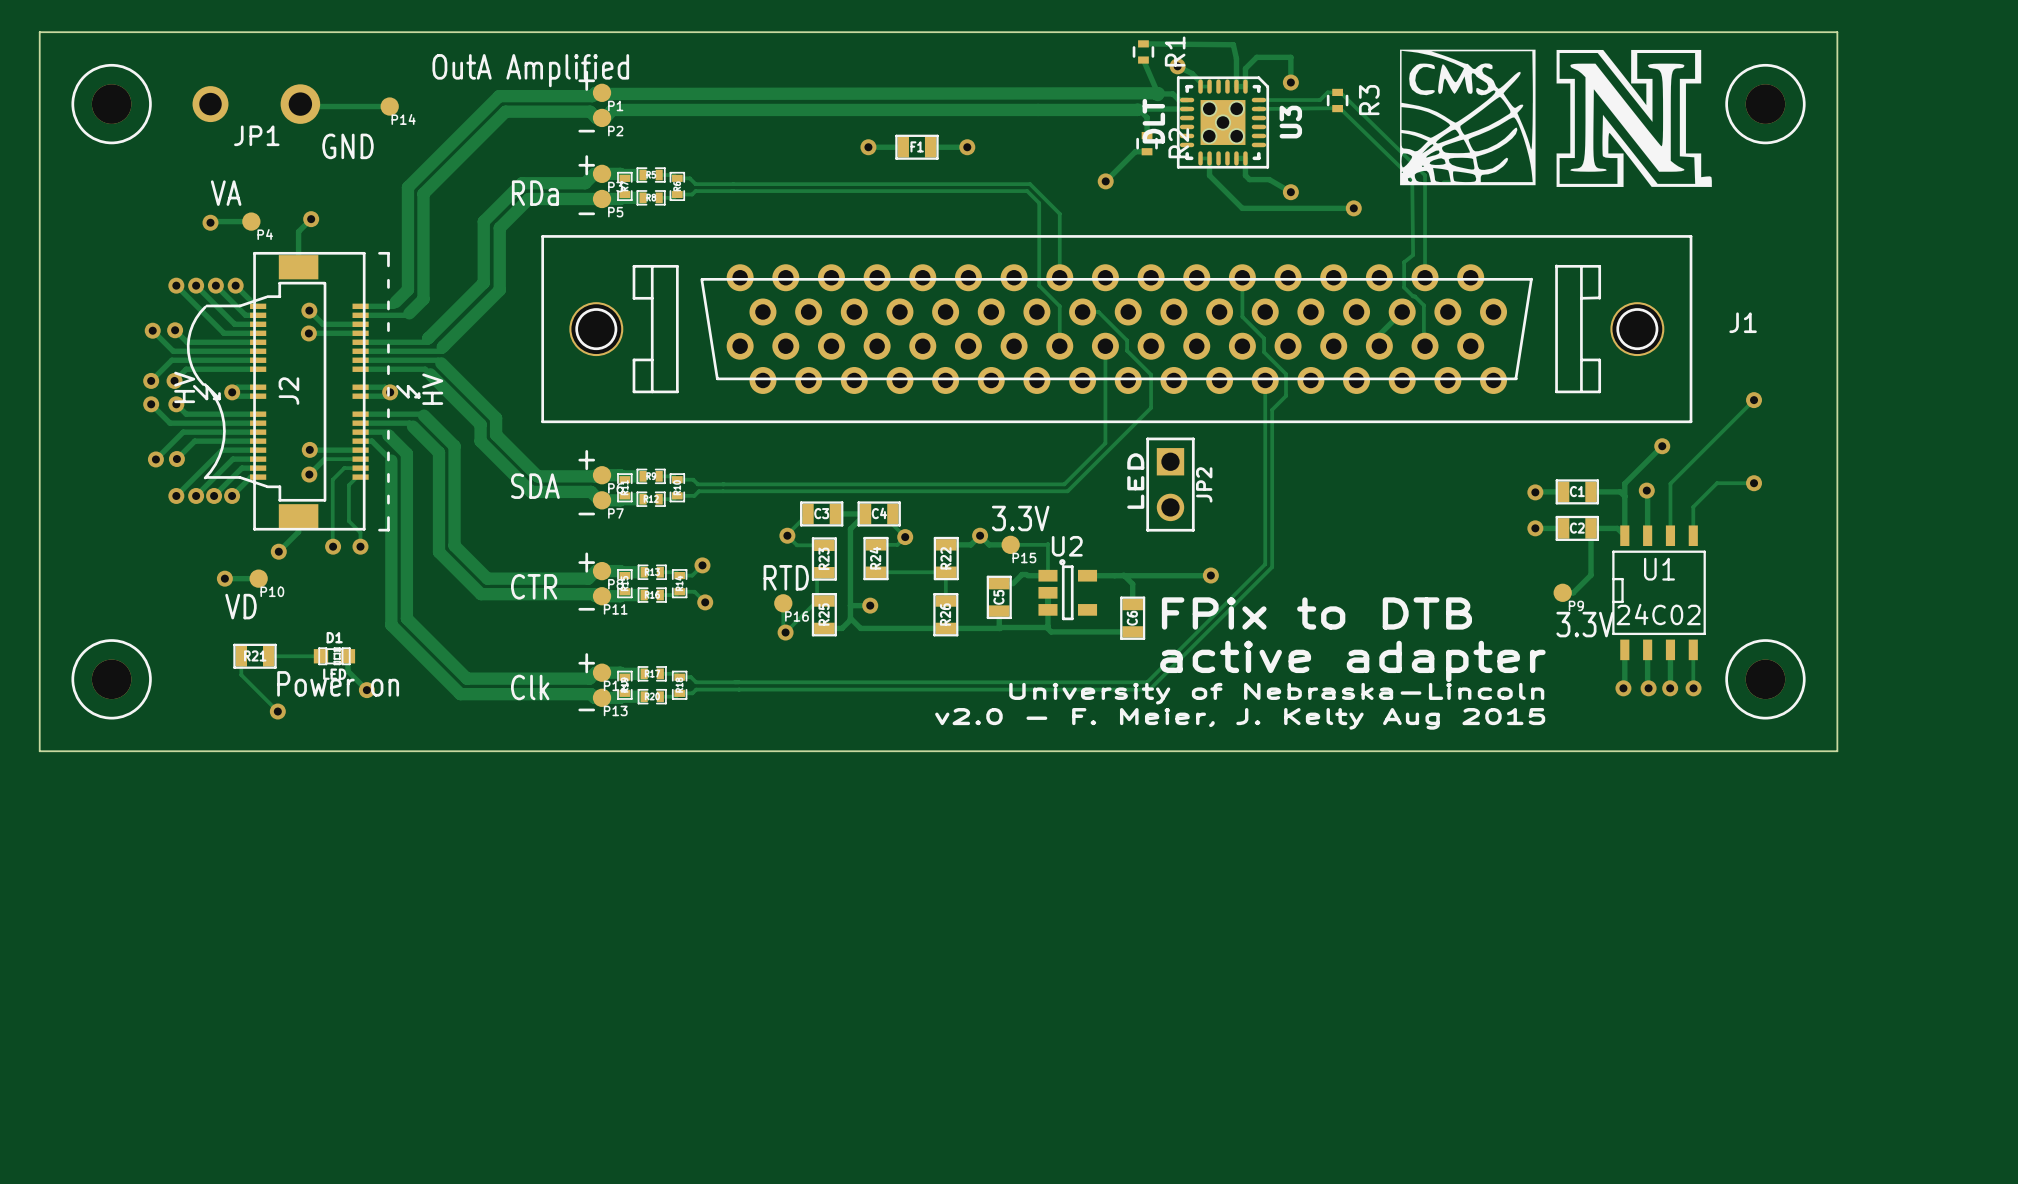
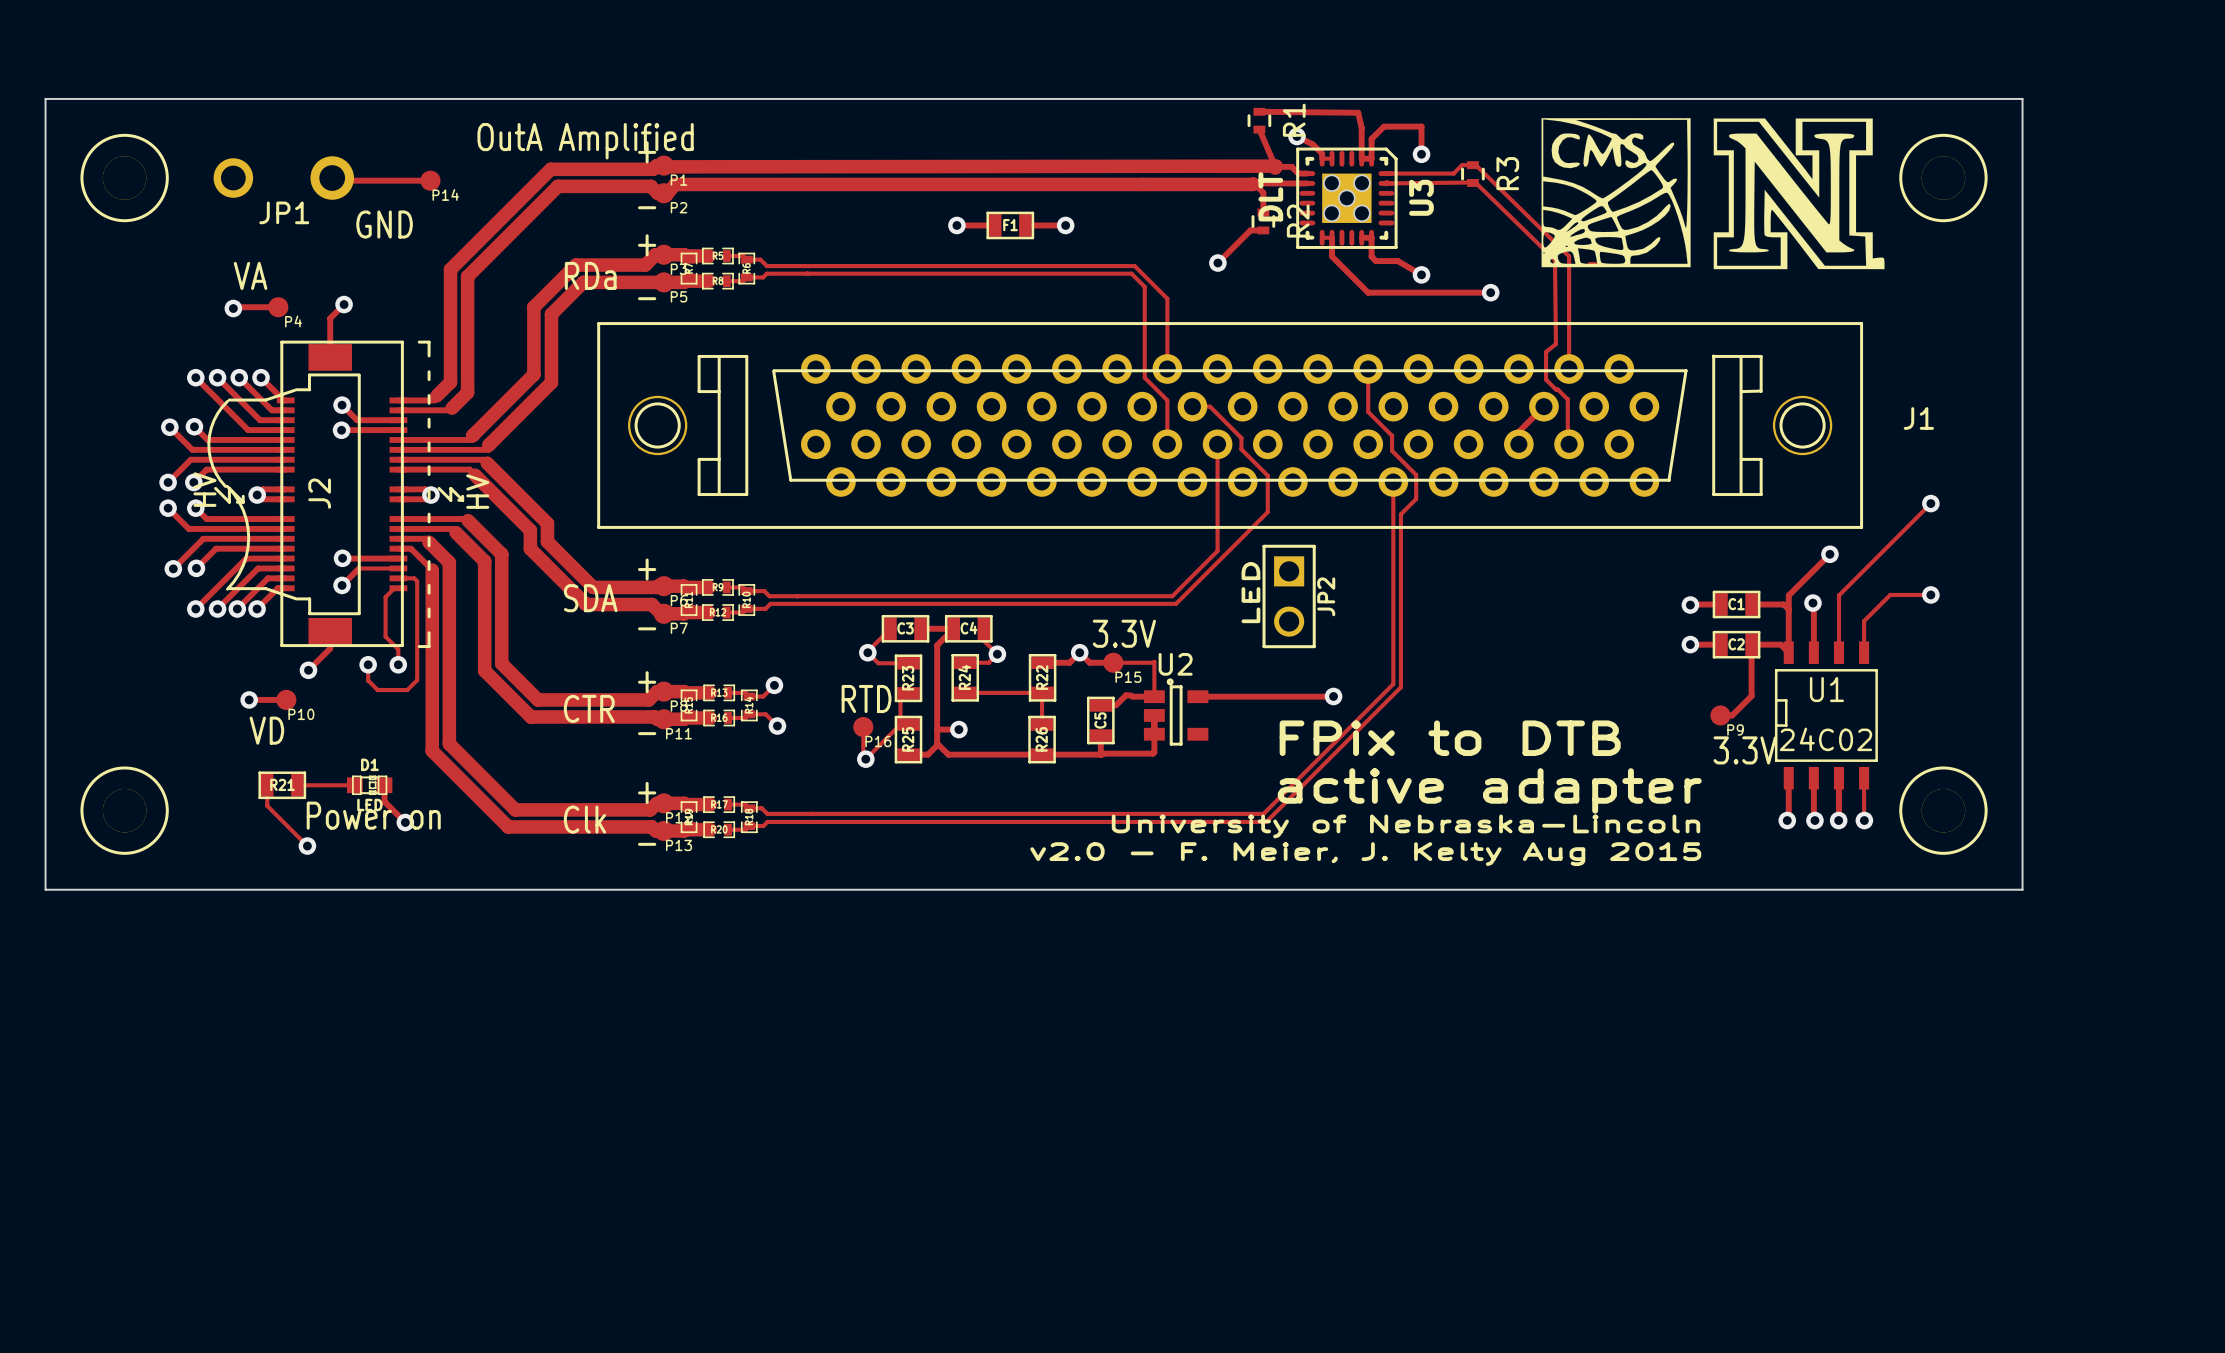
track: (360, 468) (344, 468) (332, 479) (333, 546) -> (398, 578) (414, 578) (417, 581) (417, 680) (407, 690) (377, 690) (368, 680) (368, 664)
track: (1114, 575) (1123, 575) (1132, 584) (1132, 604) -> none
C6: (1132, 618) -> none
track: (1046, 627) (1051, 631) (1132, 631) -> none

